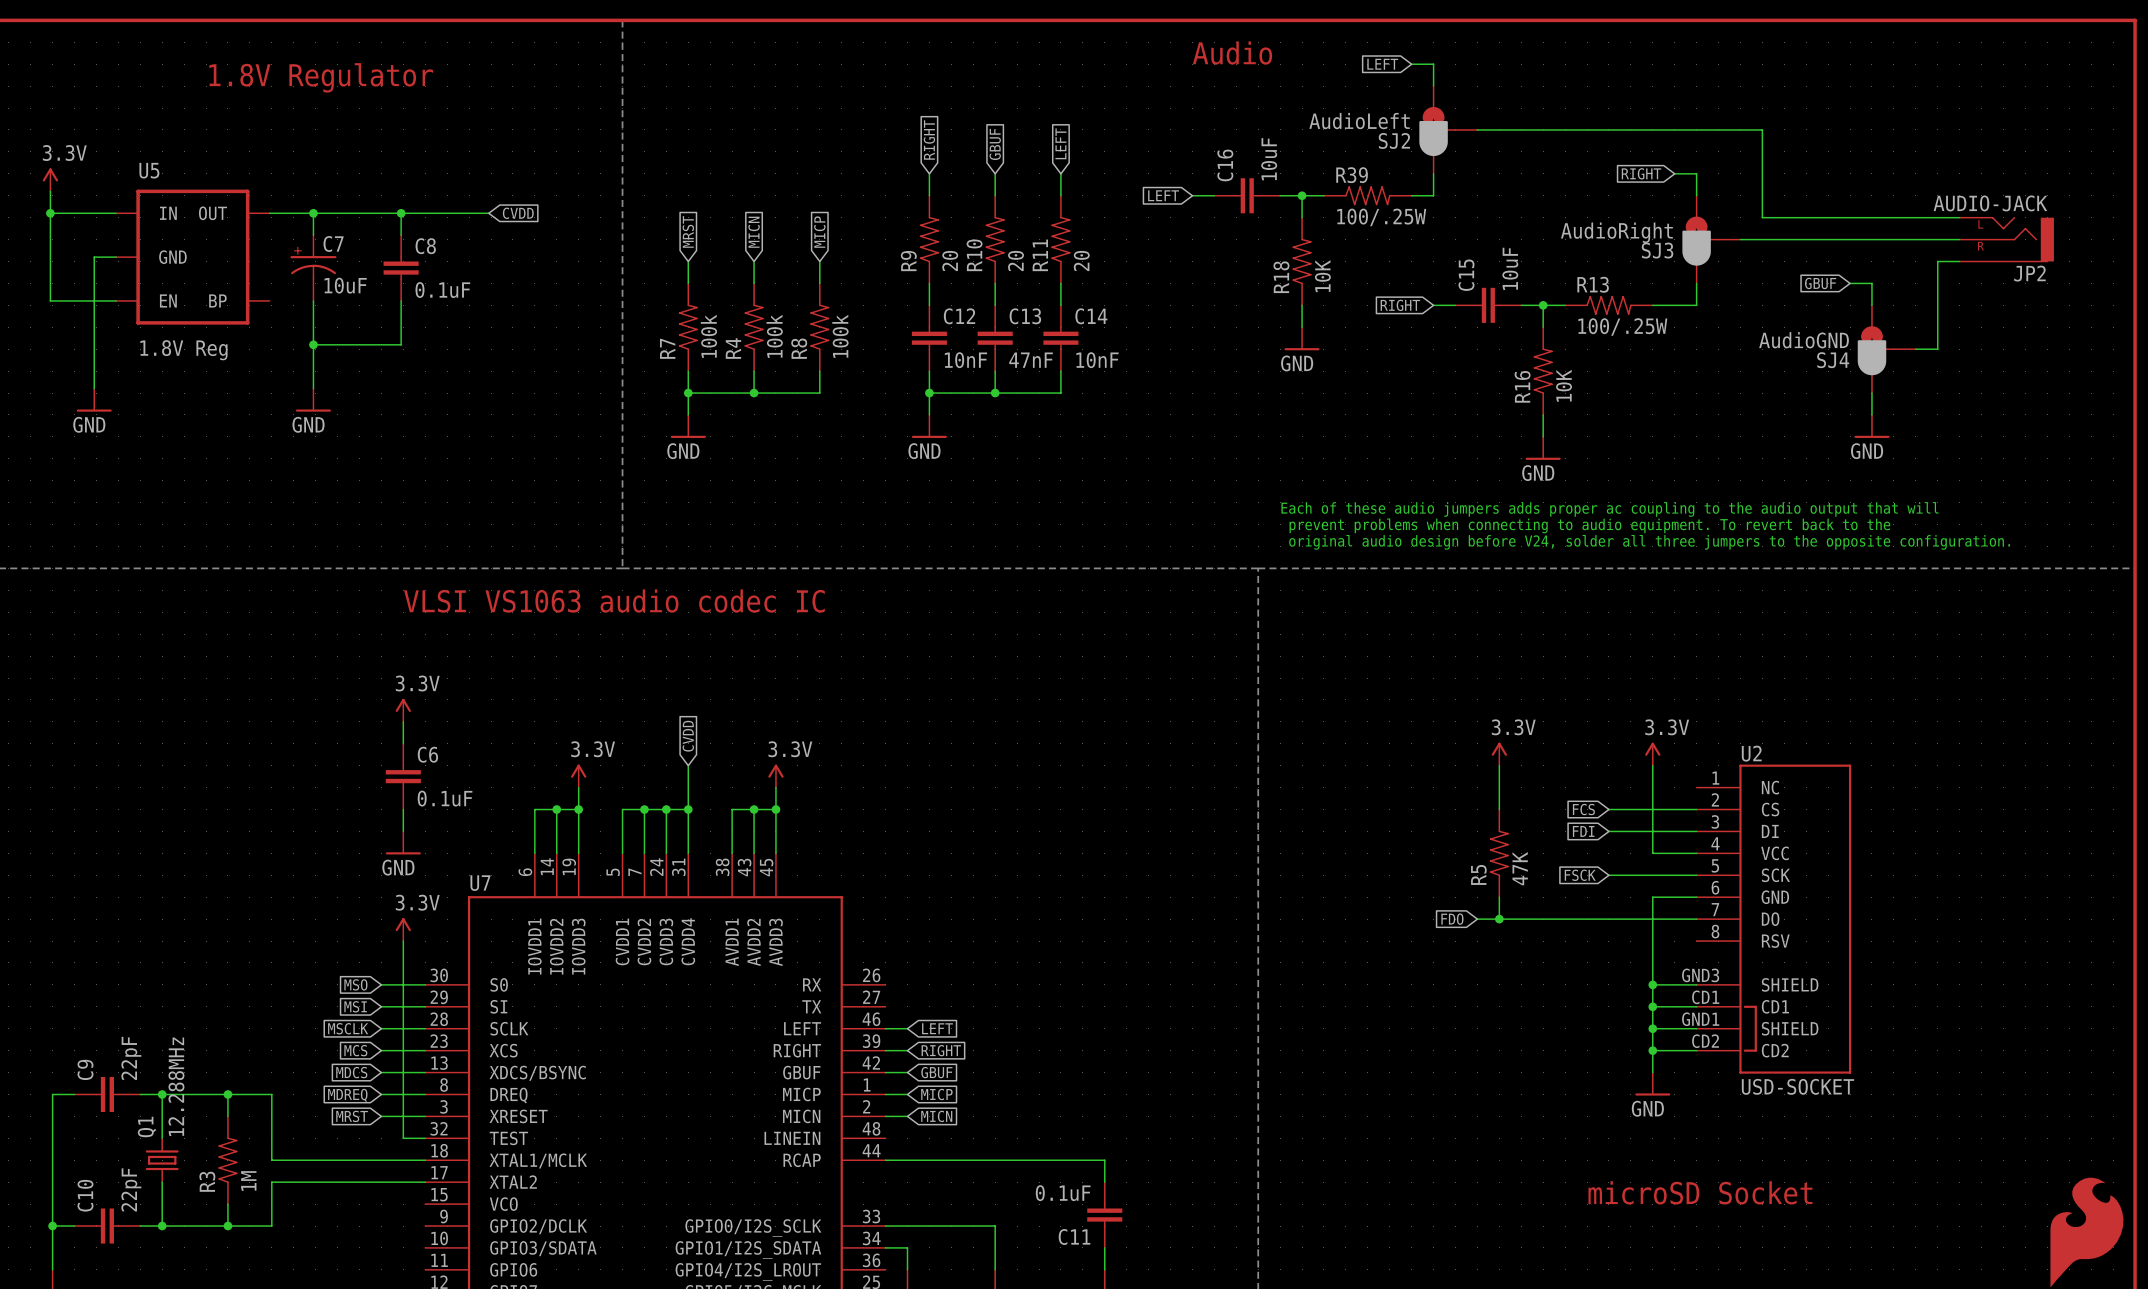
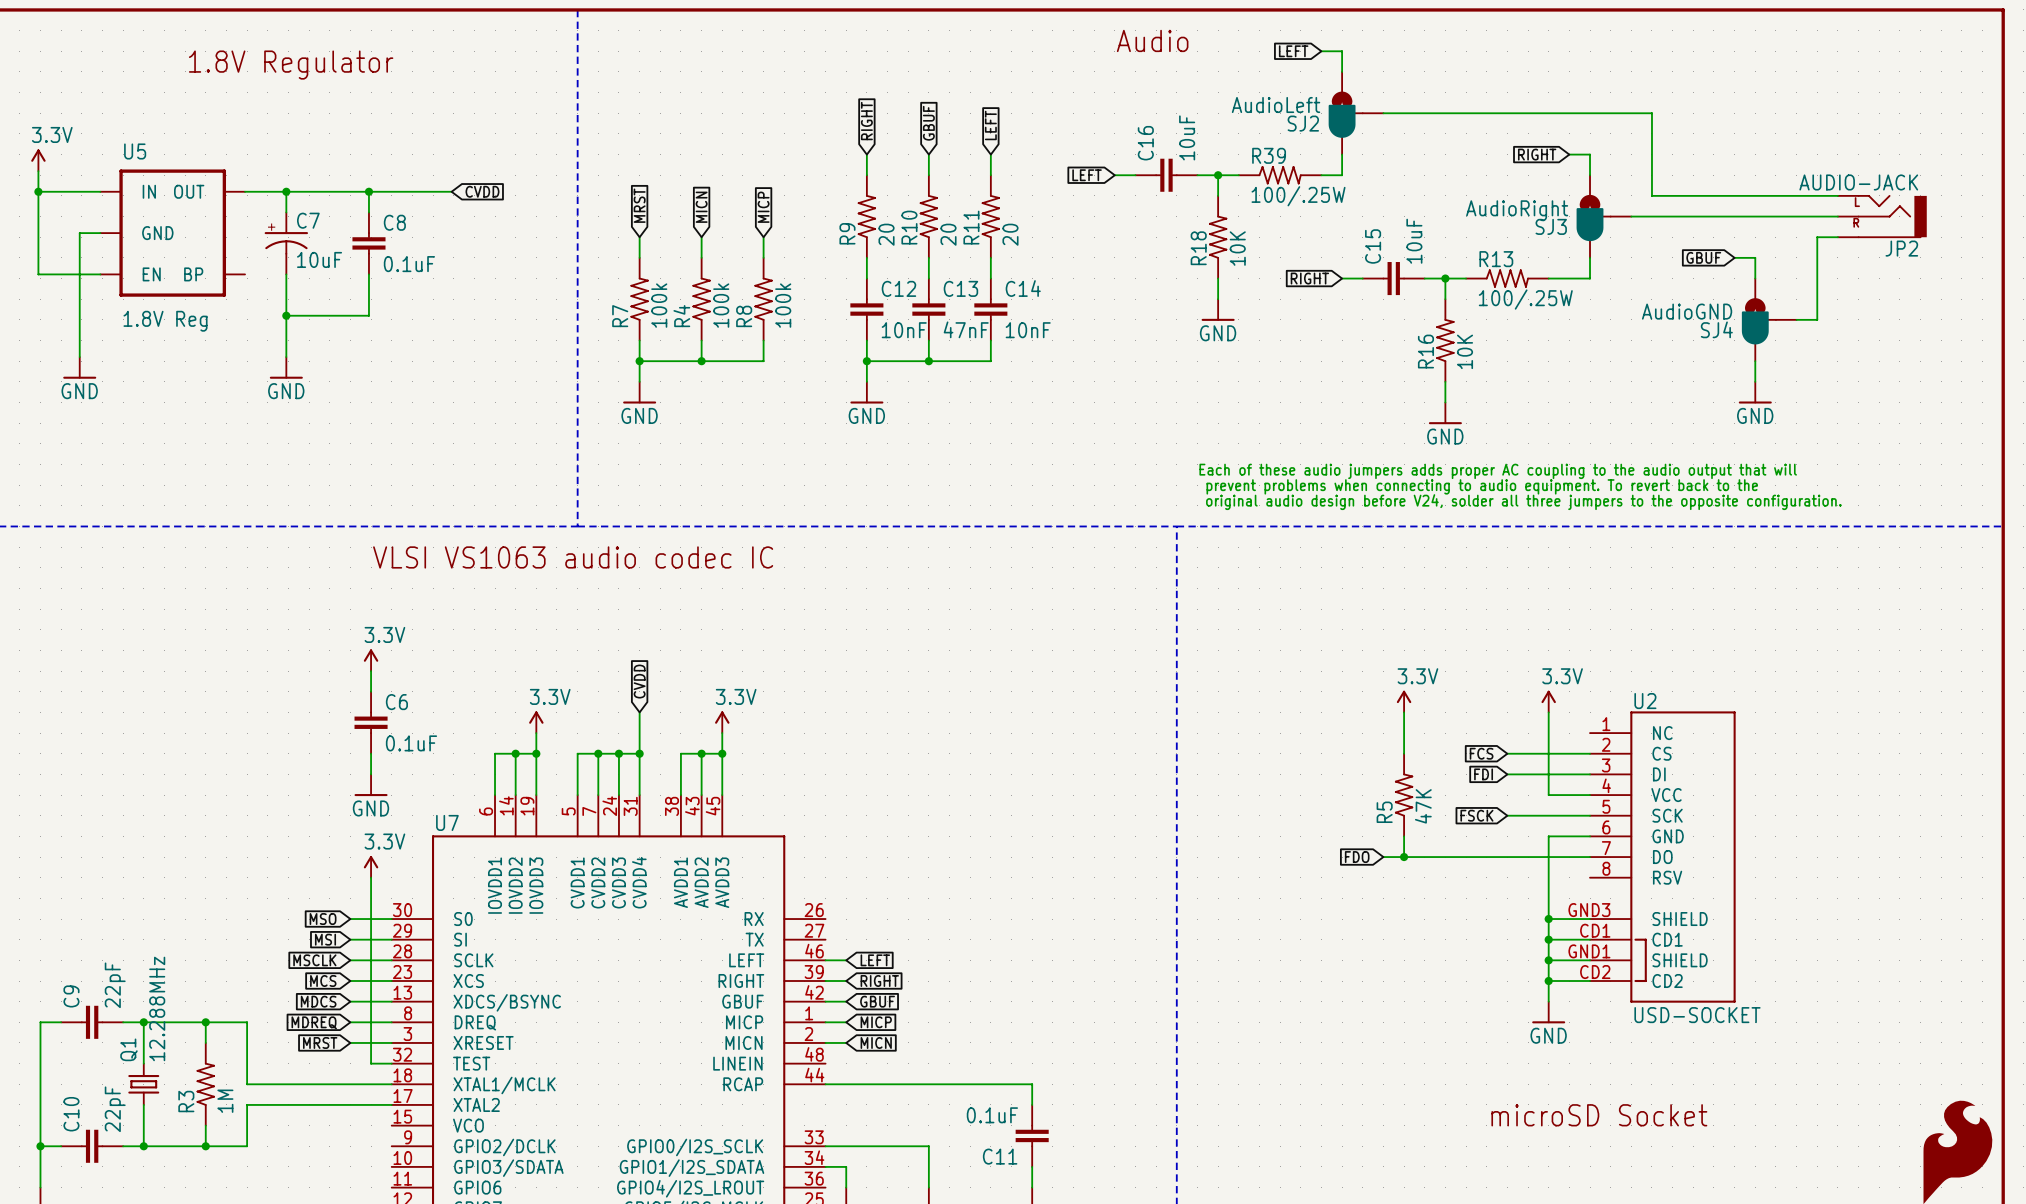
text: Each of these audio jumpers adds proper ac coupling to the audio output that will (1610, 509) -> Each of these audio jumpers adds proper AC coupling to the audio output that will (1498, 471)

